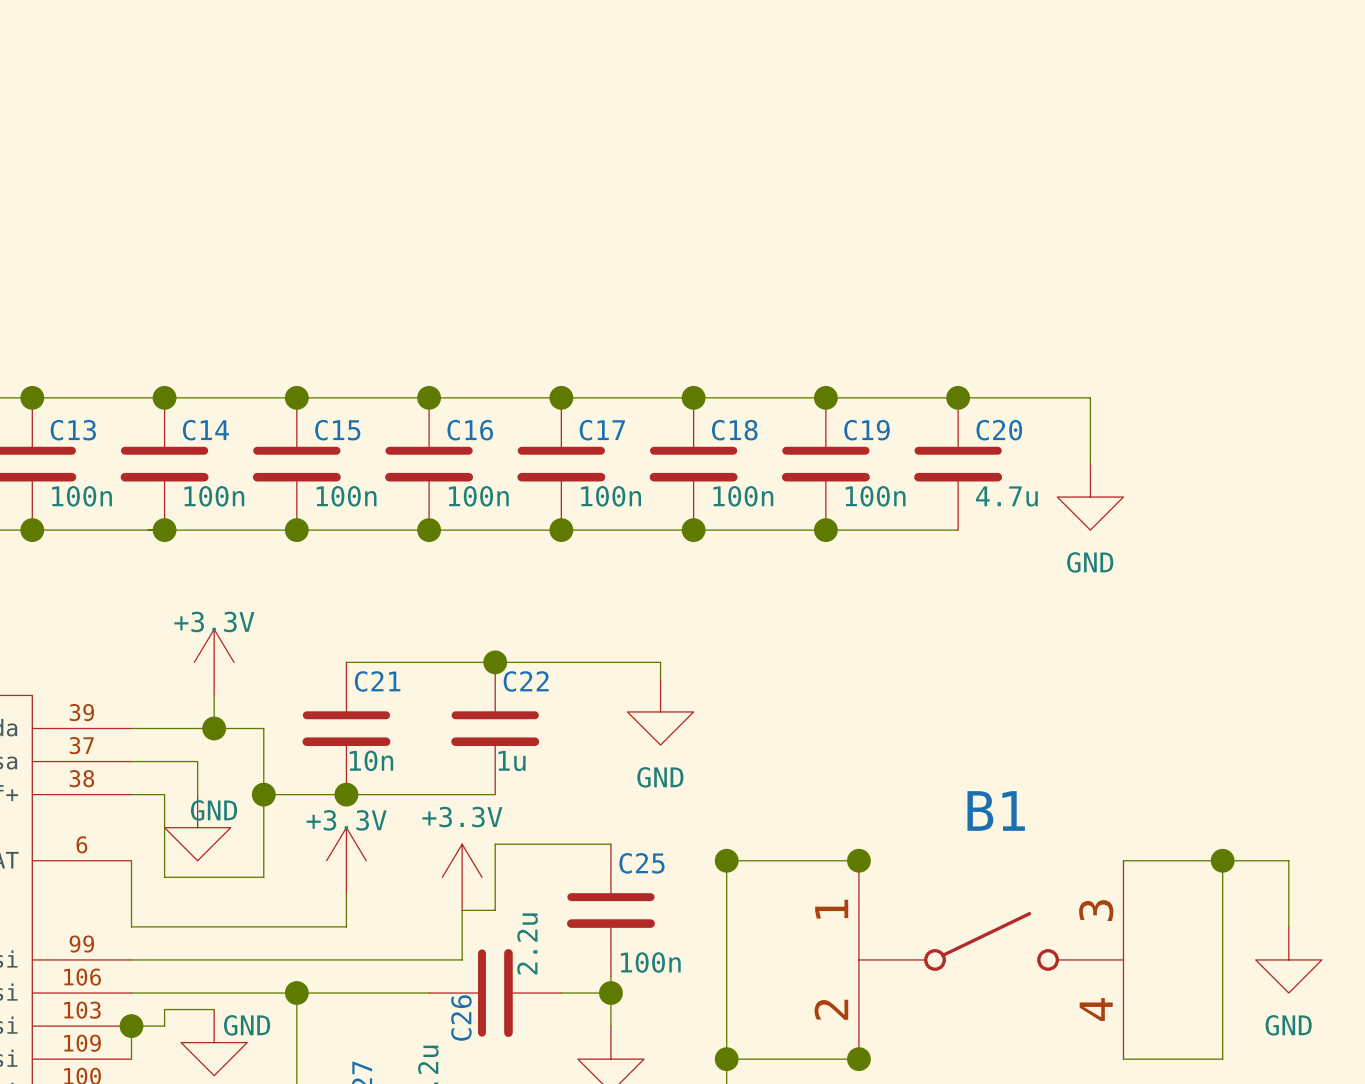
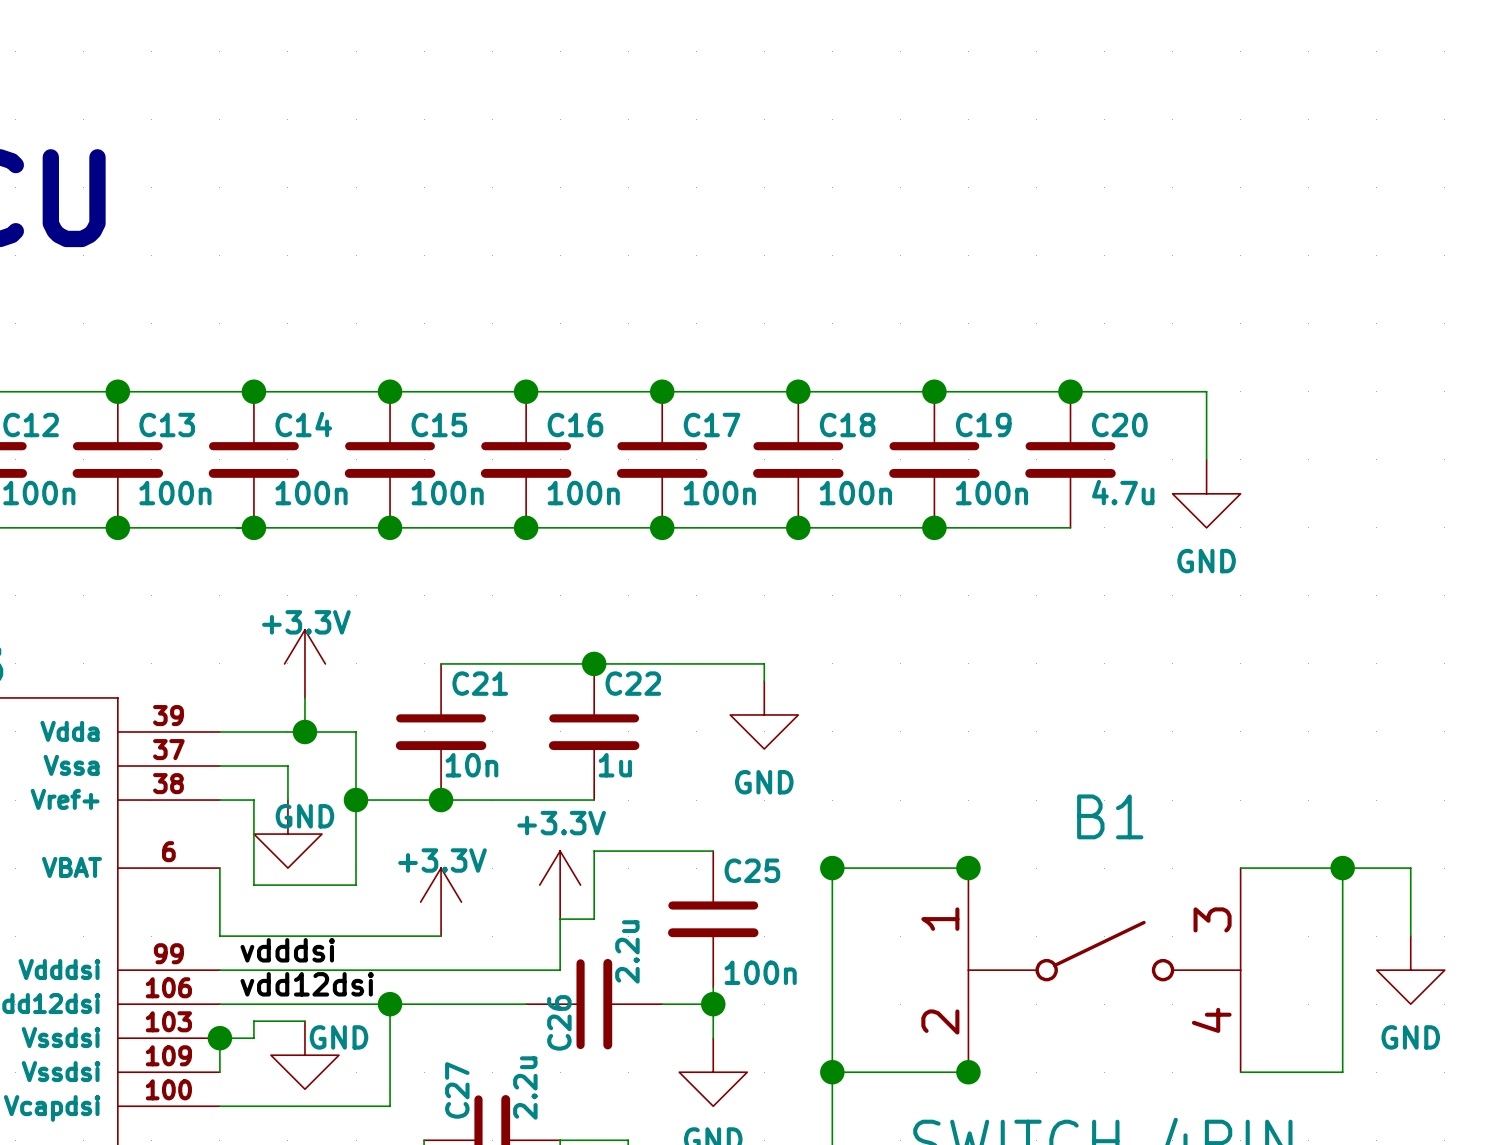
power symbol position: +3.3V (346, 860) -> +3.3V (441, 902)
label: none -> vdddsi (287, 950)
label: none -> vdd12dsi (307, 984)

